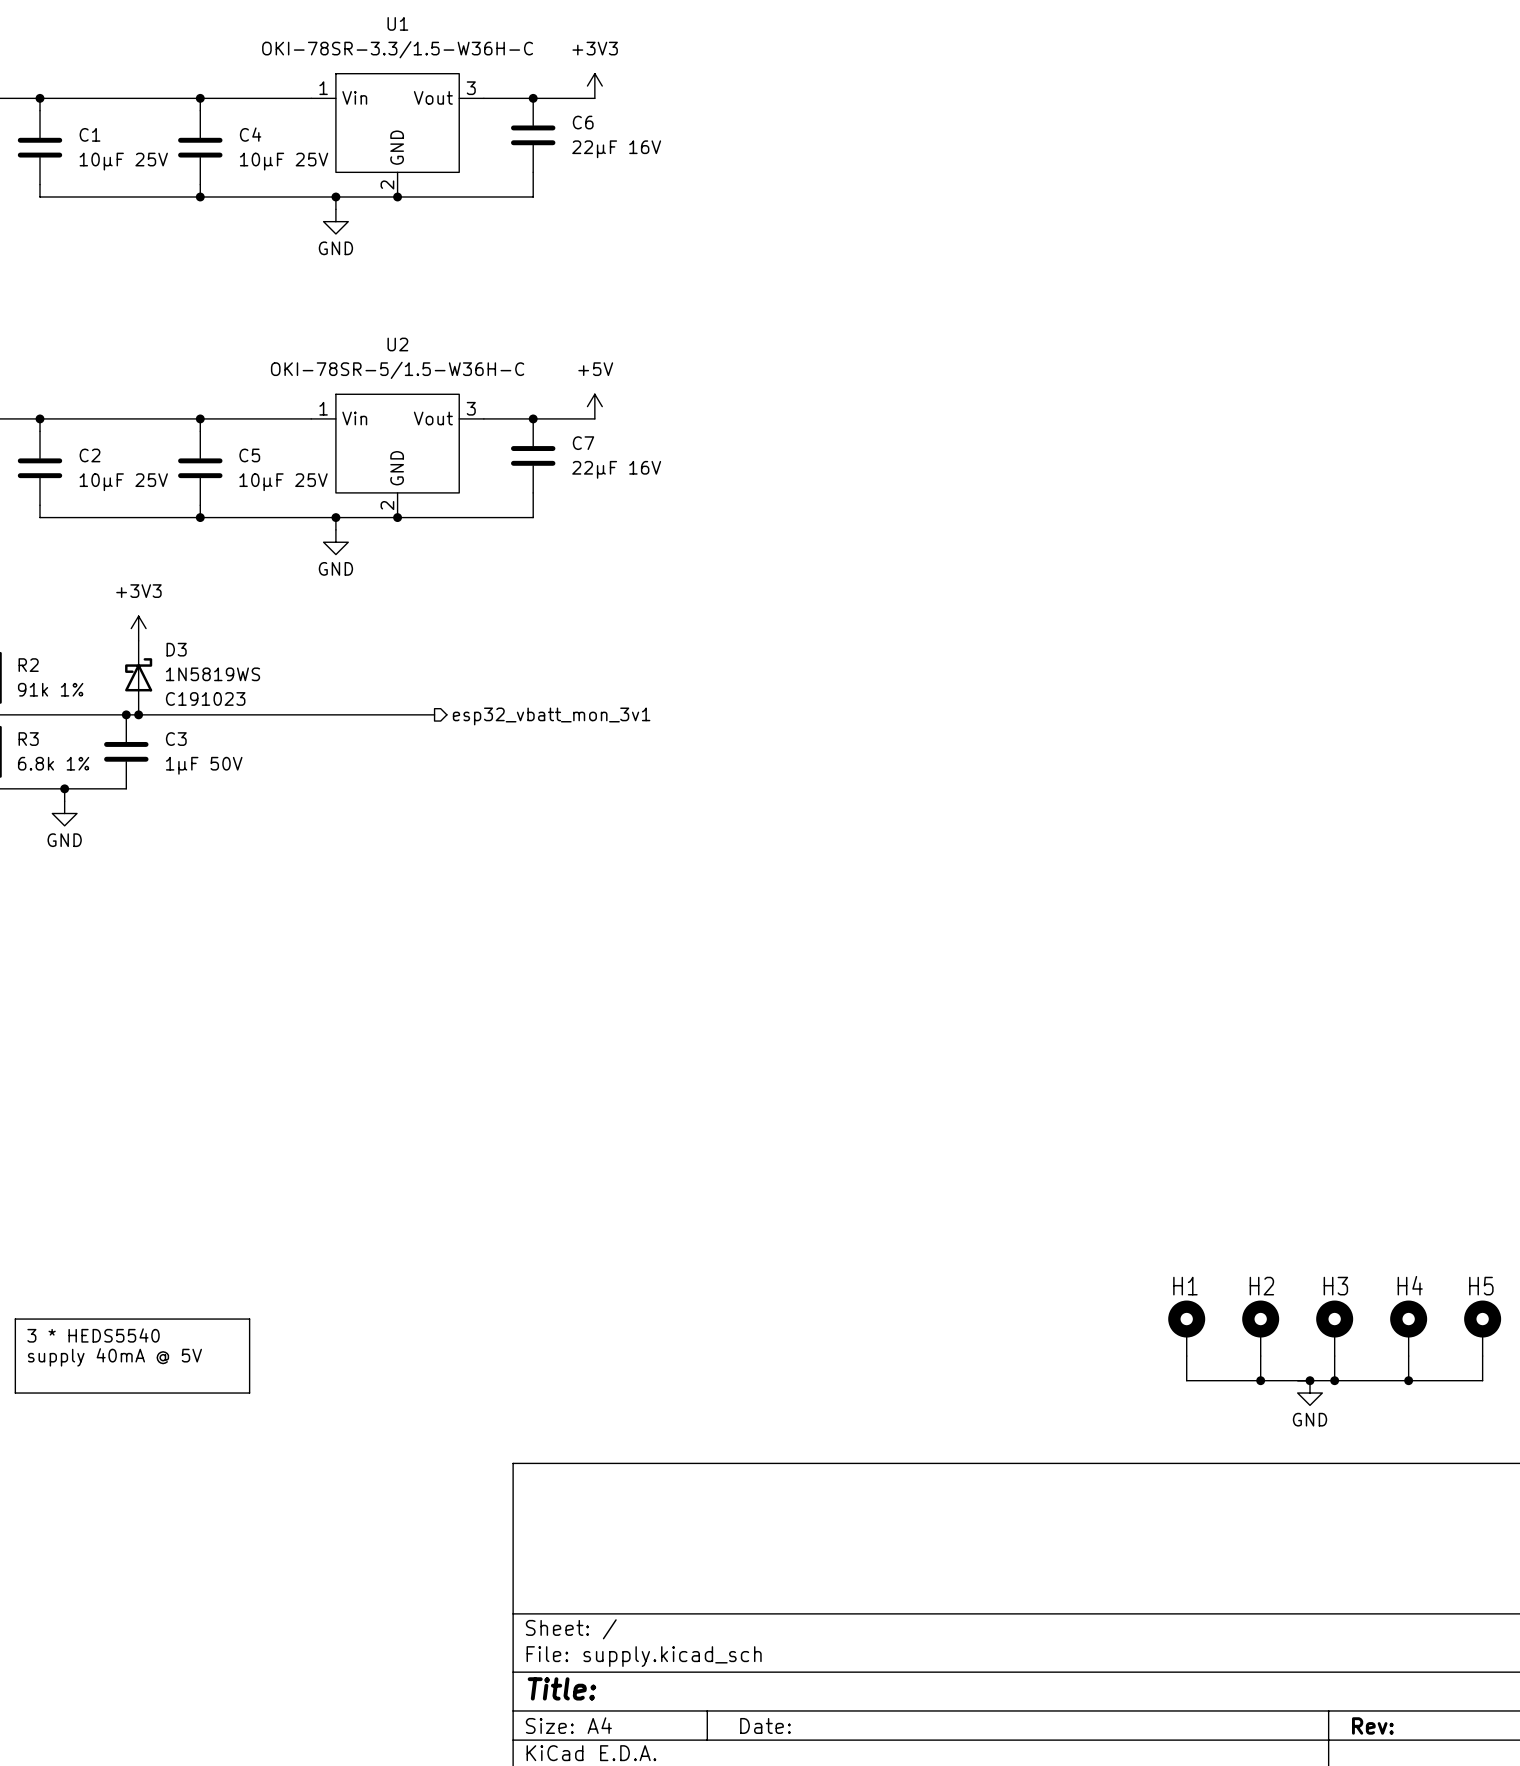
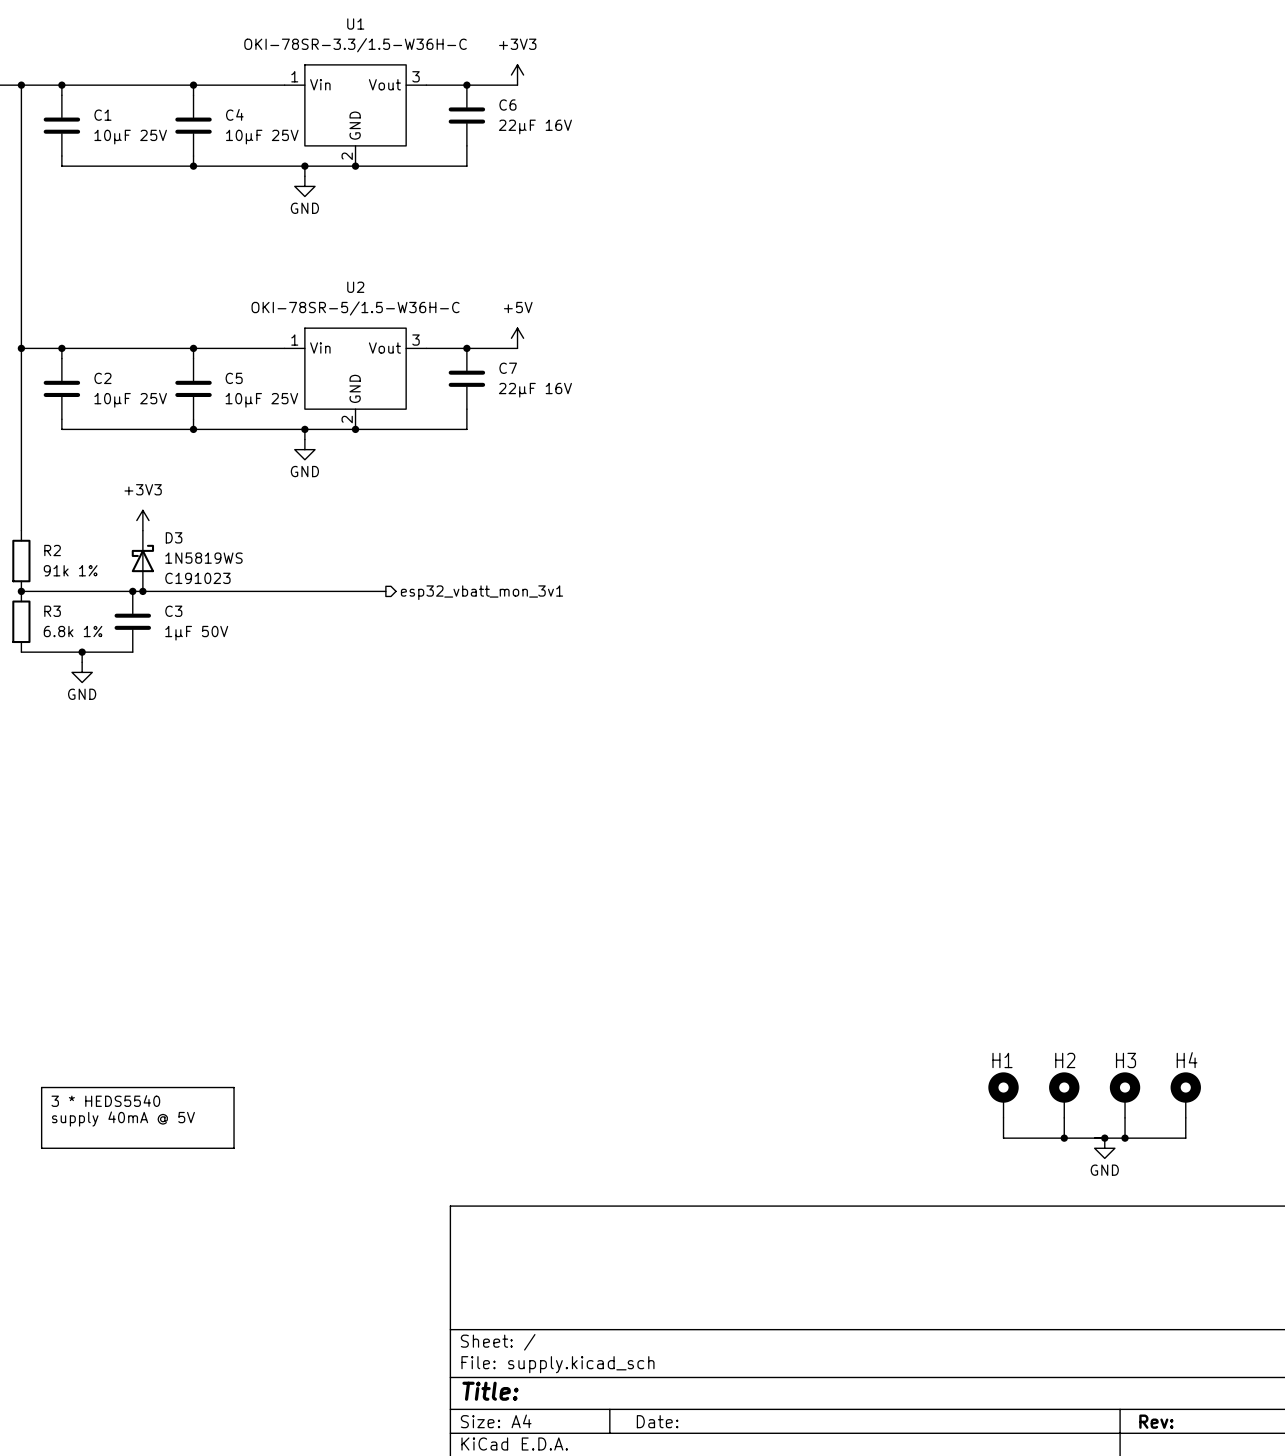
H5: (1482, 1328) -> none
wire: (1482, 1356) (1482, 1380) (1408, 1380) -> none
junction: (1408, 1380) -> none

